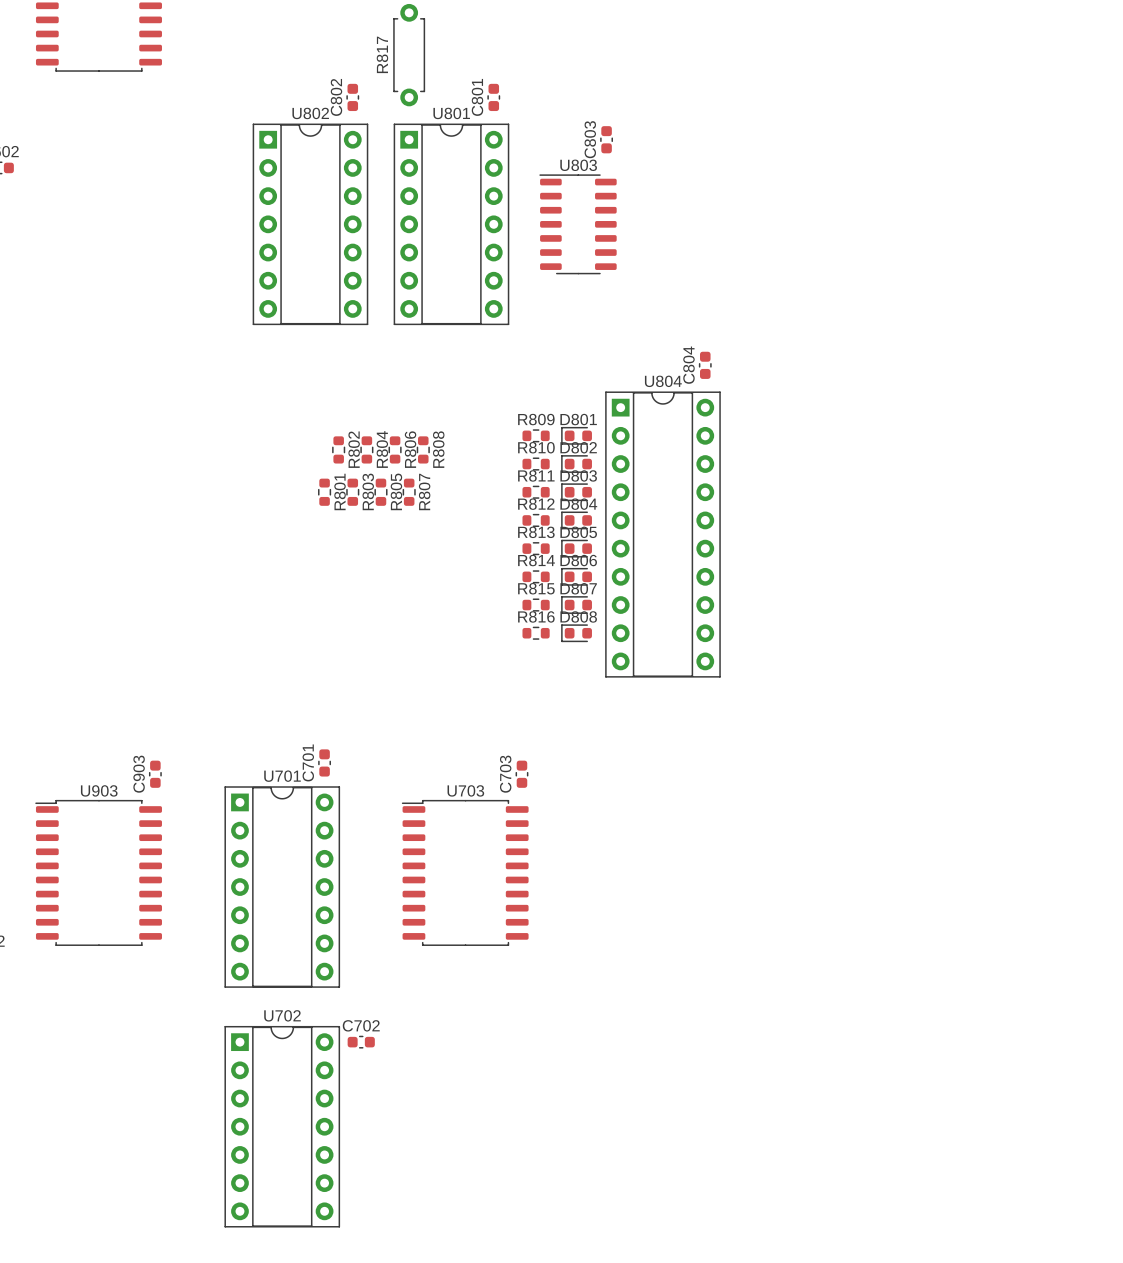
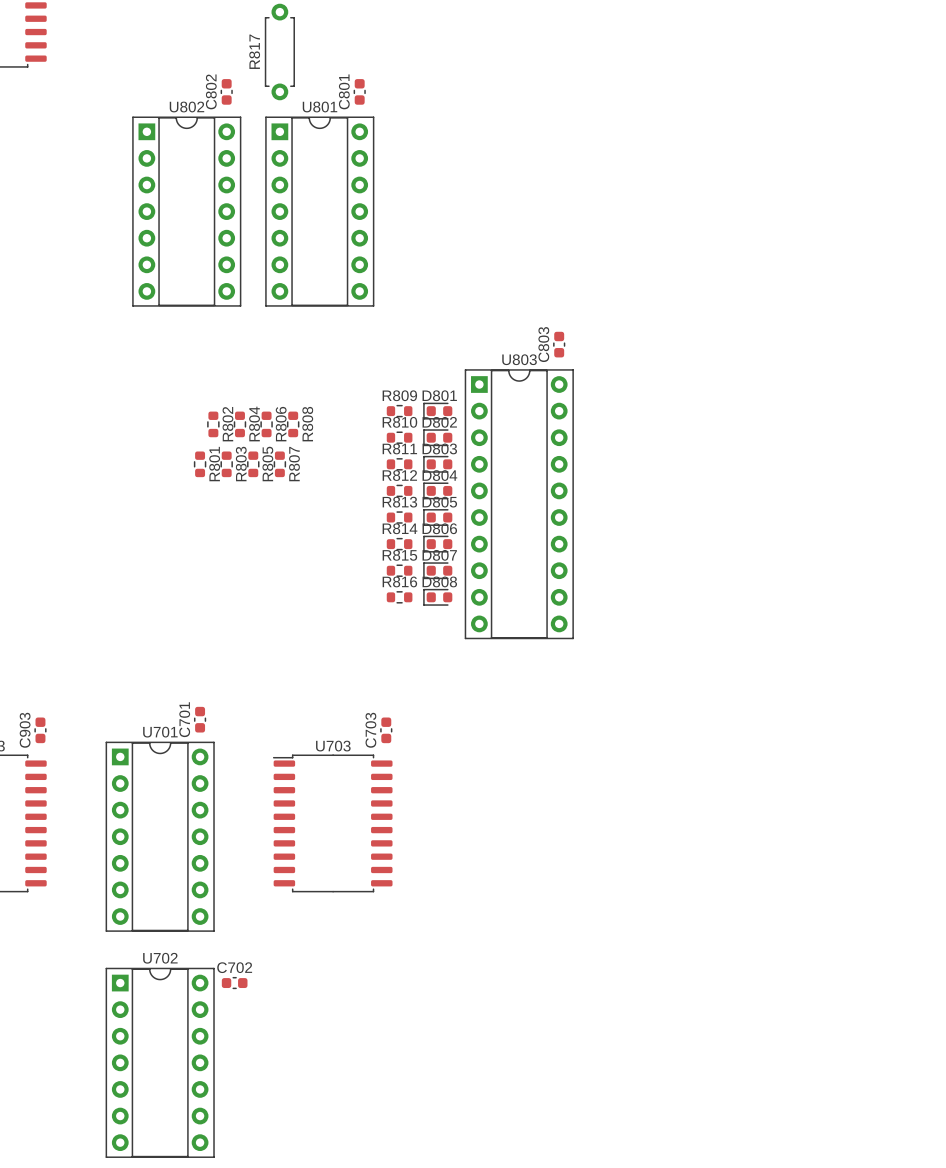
C803: (606, 139) -> none
U803: (578, 224) -> none
C804 name: C804 (688, 365) -> C803 (543, 344)
U804 name: U804 (663, 381) -> U803 (519, 359)

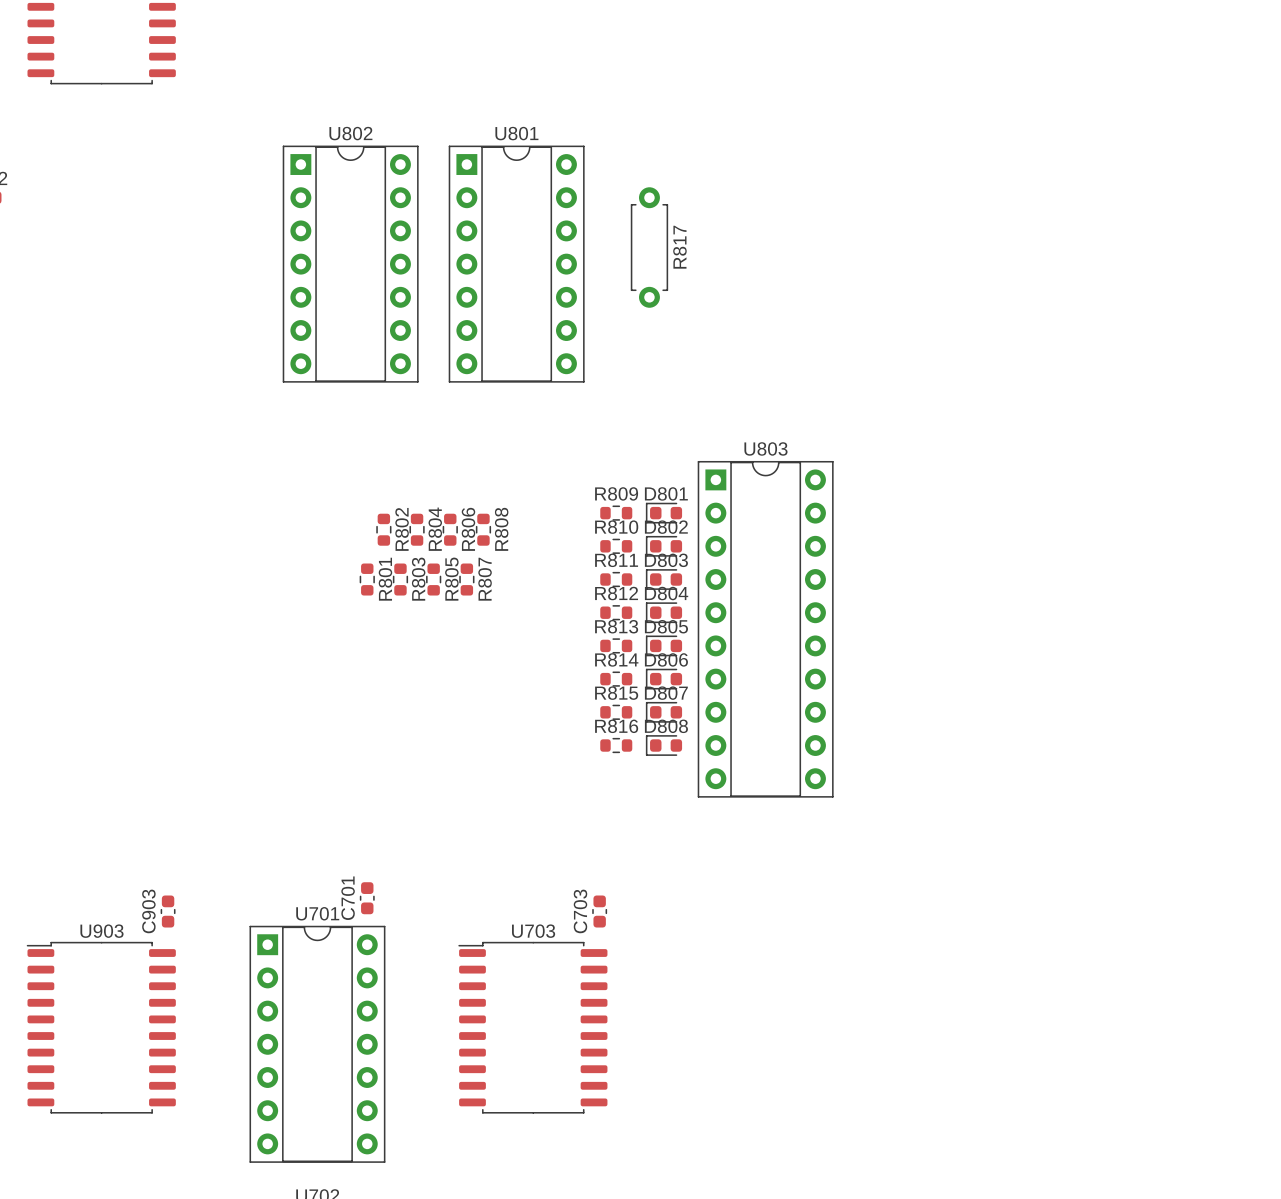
R817 name position: R817 (254, 51) -> R817 (679, 247)
R817 position: (279, 51) -> (649, 247)
C802: (226, 91) -> none
C801: (359, 91) -> none
C803: (559, 344) -> none

